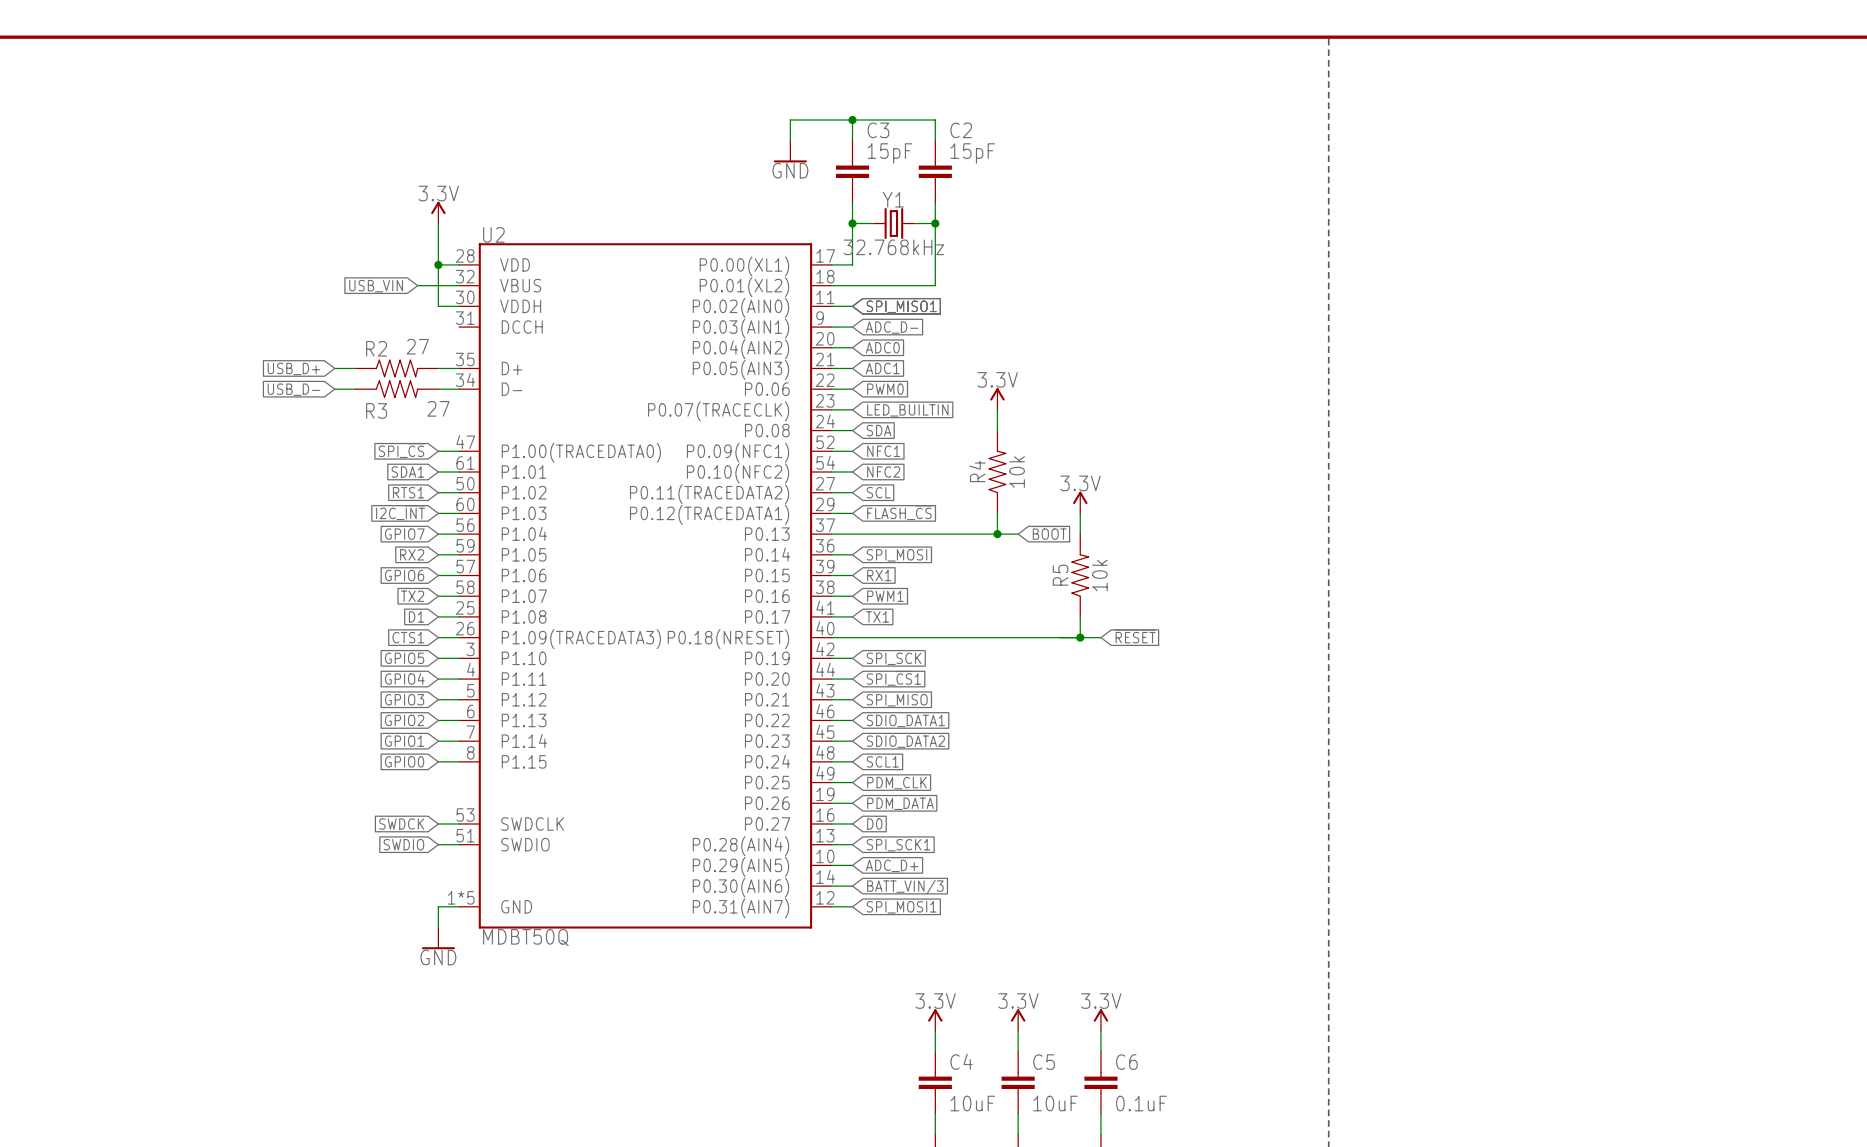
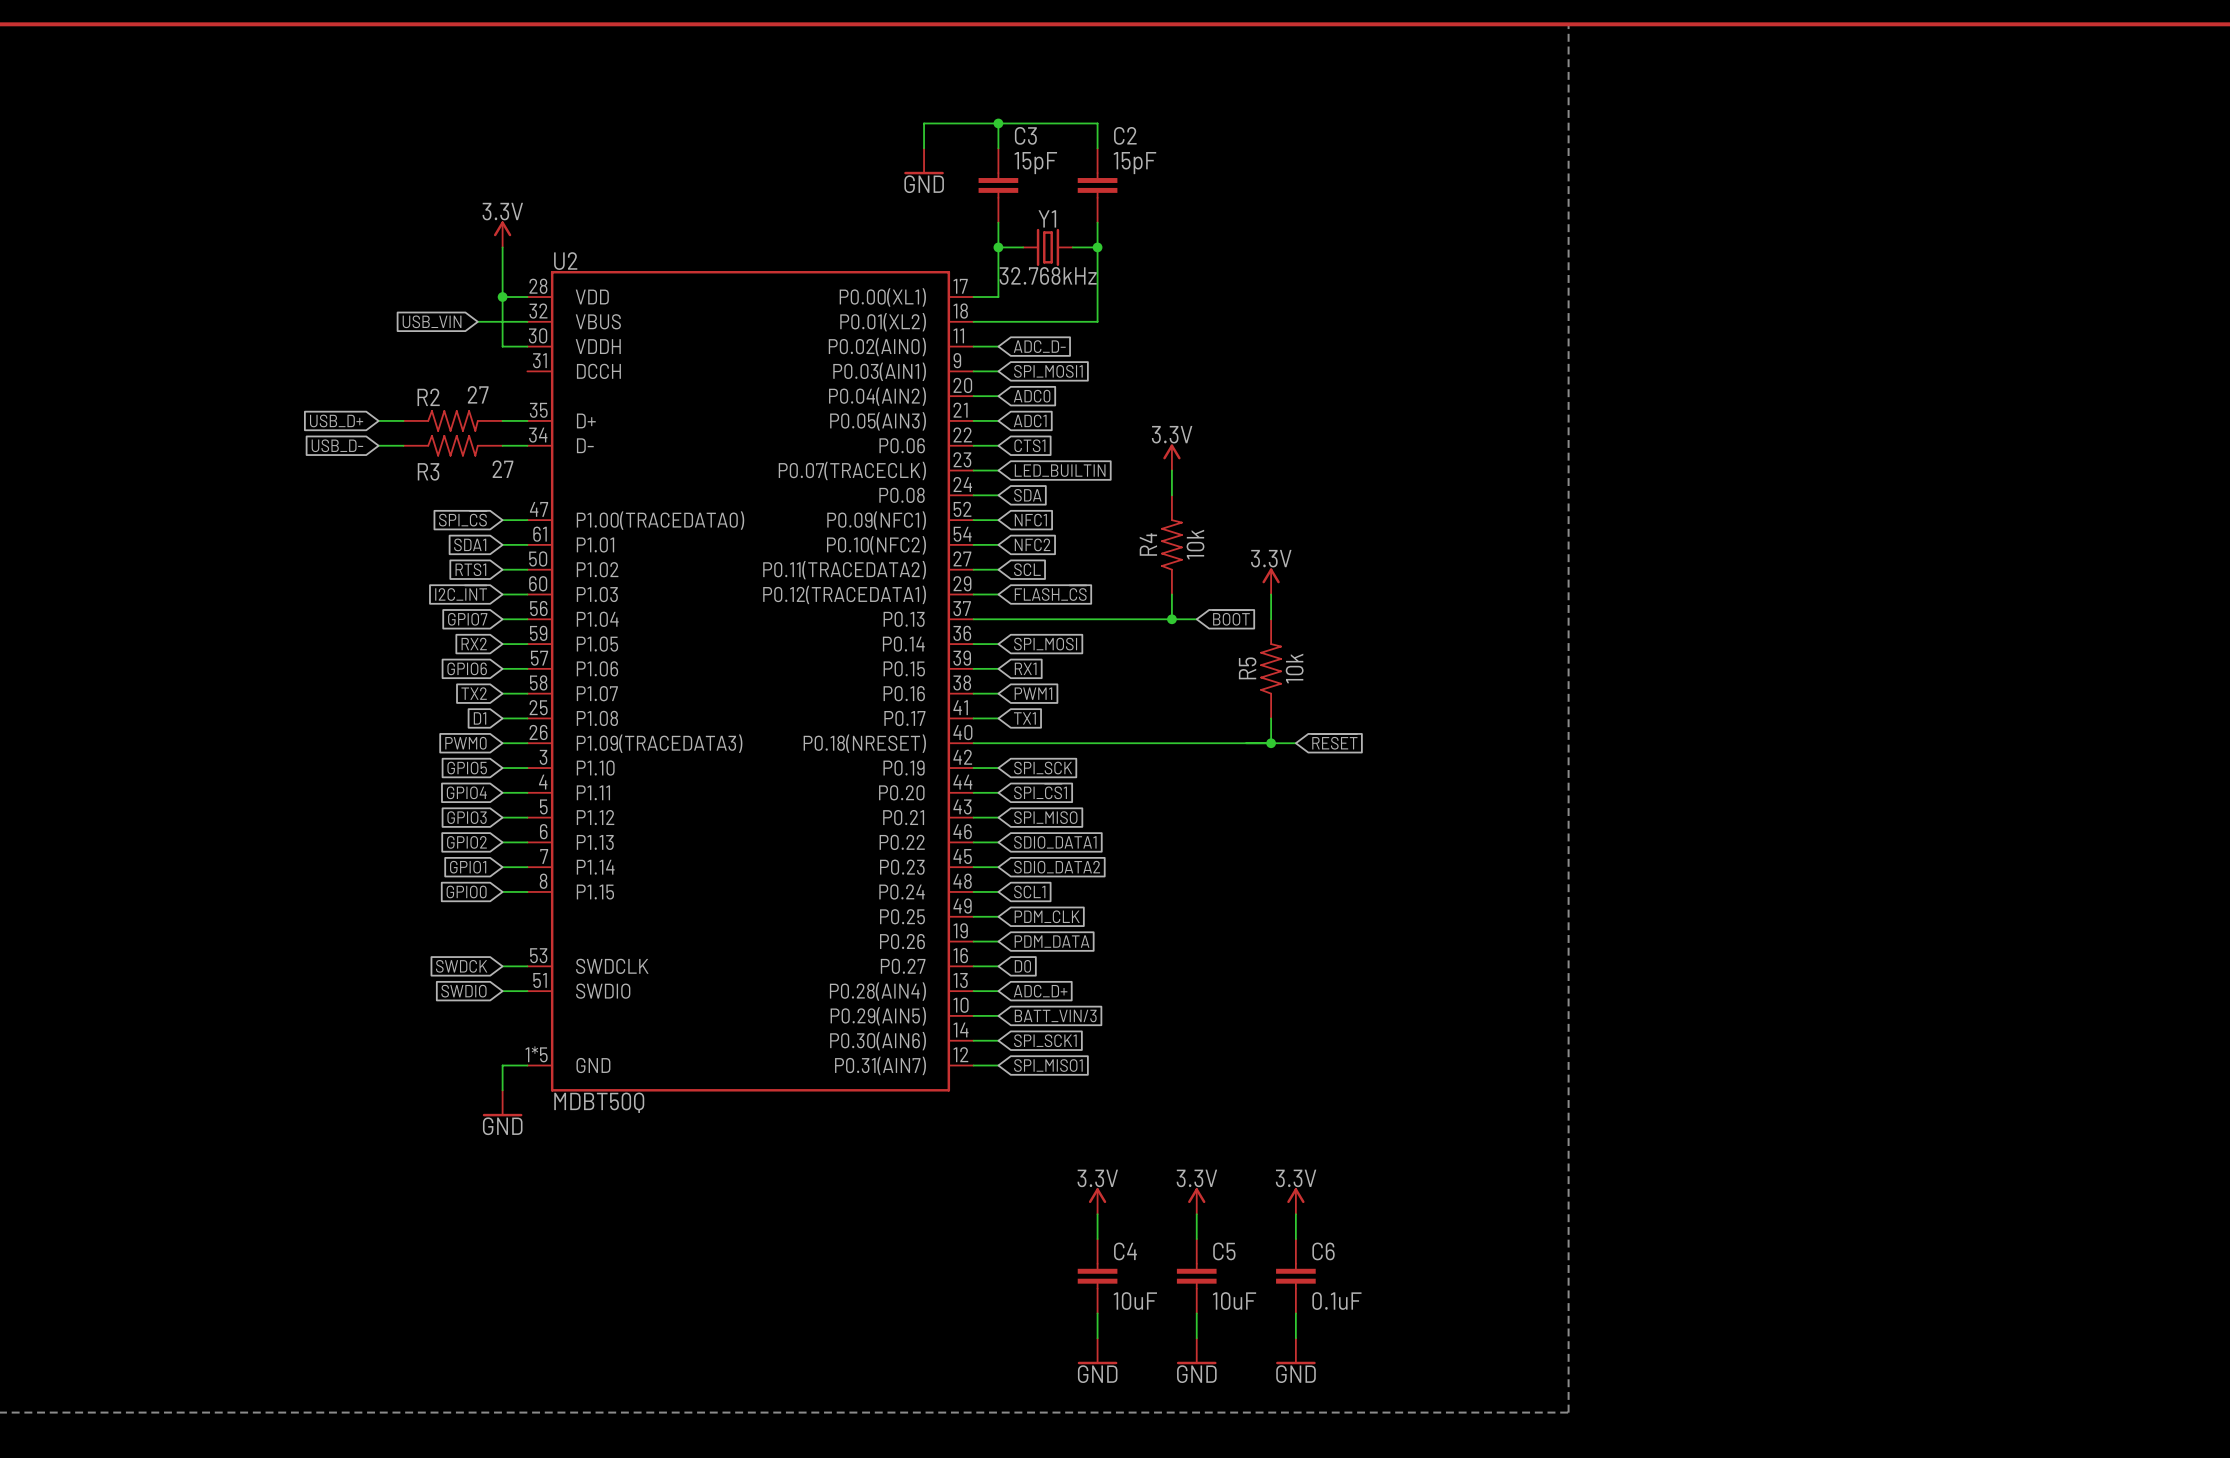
global label: SPI_MISO1 (901, 306) -> ADC_D- (1039, 346)
global label: ADC_D- (892, 327) -> SPI_MOSI1 (1048, 371)
global label: PWM0 (885, 389) -> CTS1 (1029, 445)
global label: CTS1 (408, 637) -> PWM0 (465, 743)
global label: SPI_SCK1 (898, 845) -> ADC_D+ (1040, 991)
global label: ADC_D+ (892, 865) -> BATT_VIN/3 (1055, 1016)
global label: BATT_VIN/3 (905, 887) -> SPI_SCK1 (1045, 1040)
global label: SPI_MOSI1 (901, 907) -> SPI_MISO1 (1048, 1065)

